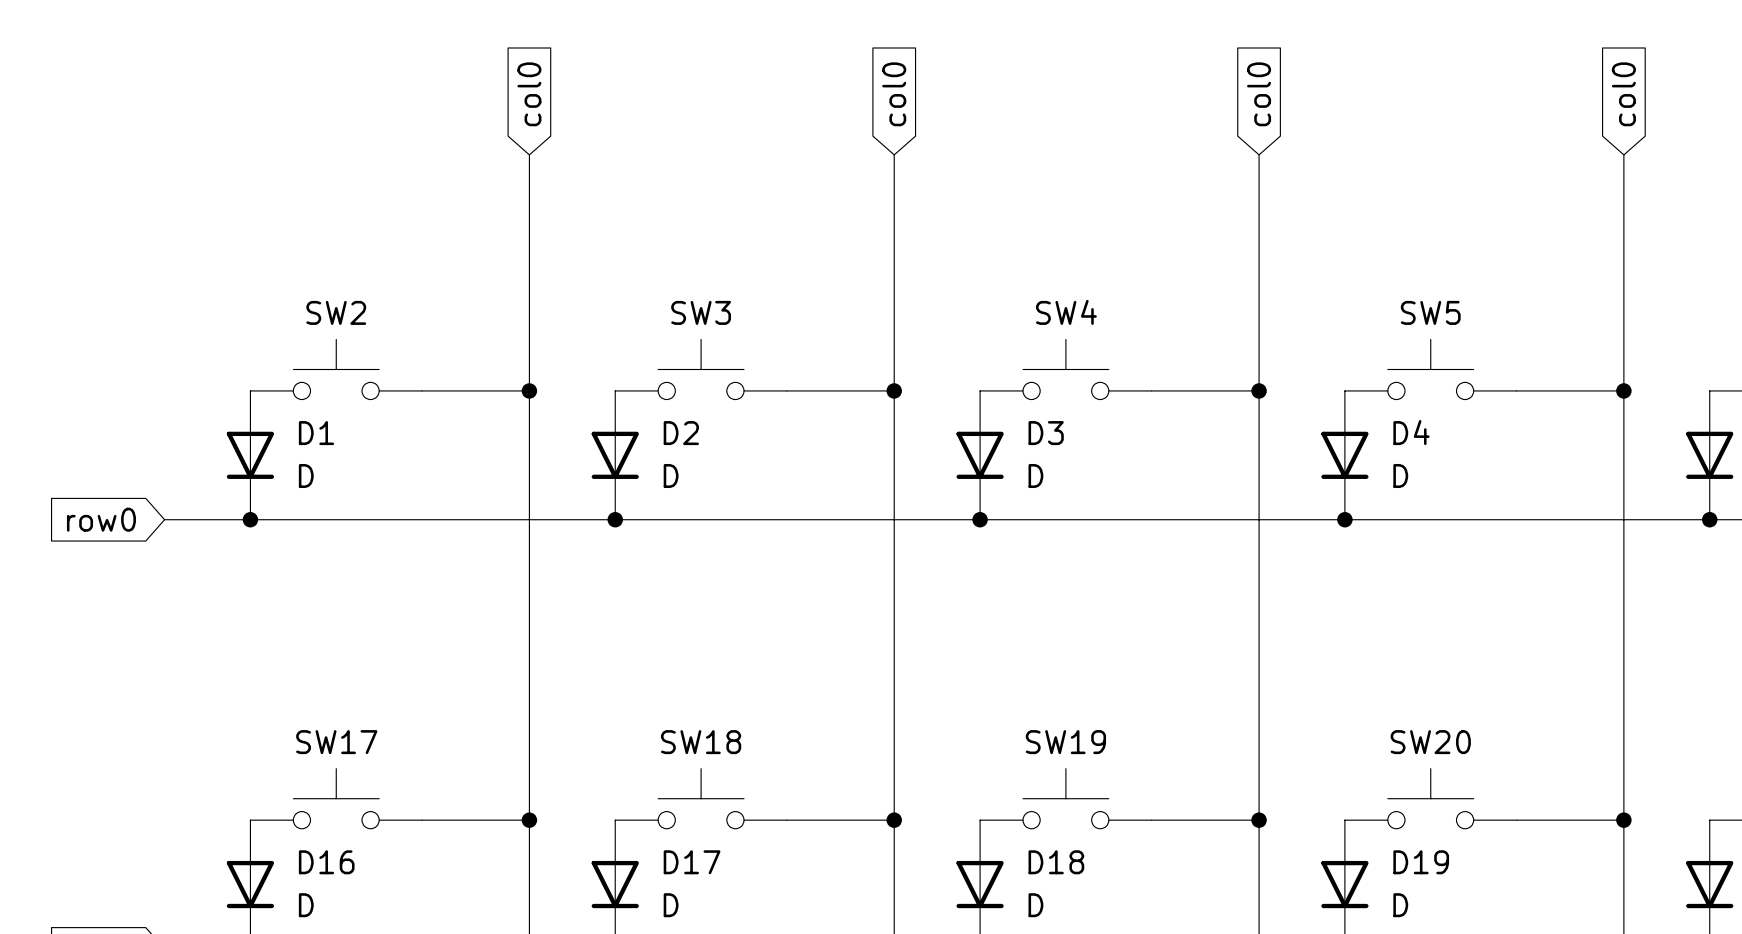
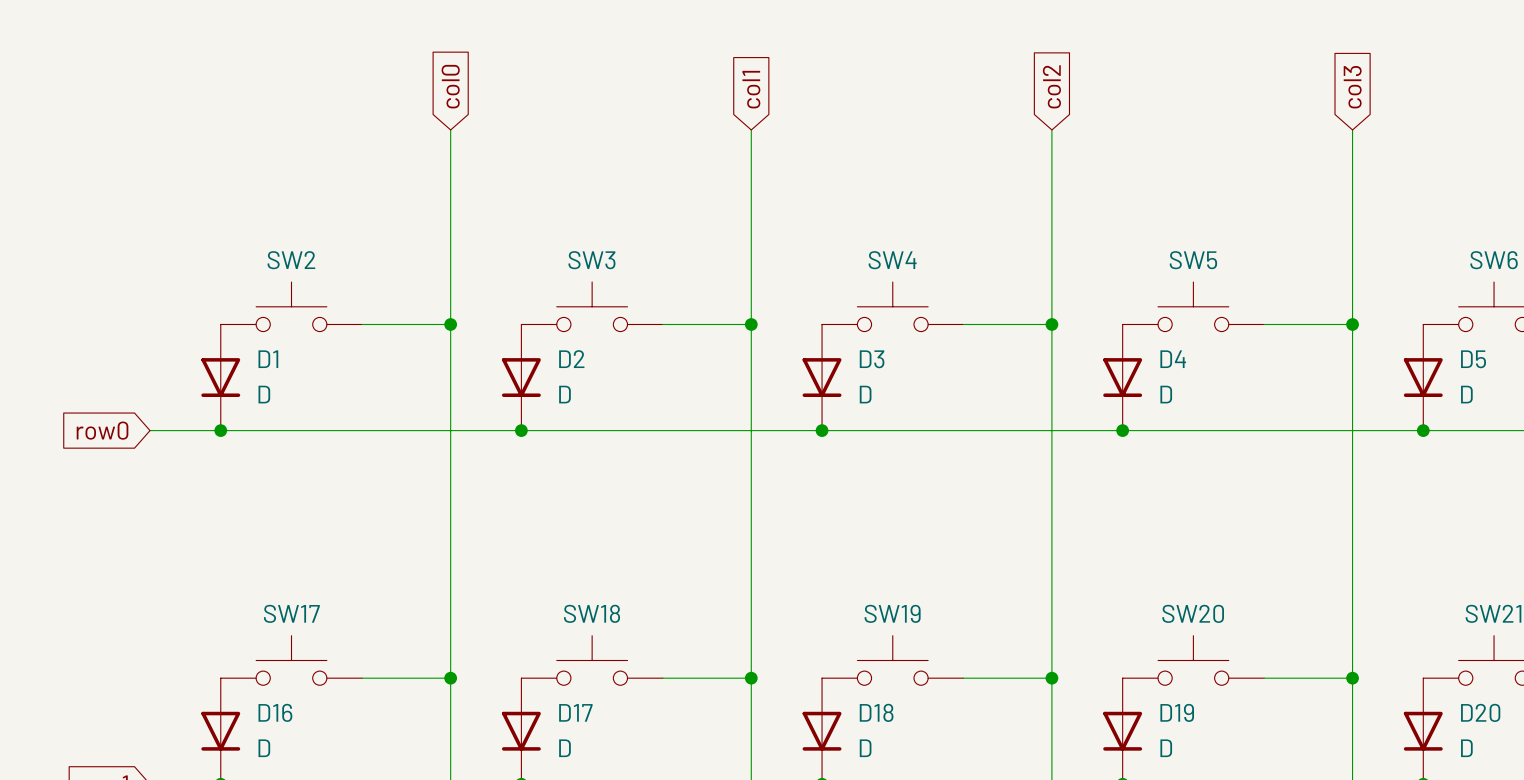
global label: col0 (894, 94) -> col1 (751, 89)
global label: col0 (1259, 94) -> col2 (1051, 86)
global label: col0 (1623, 94) -> col3 (1352, 87)

